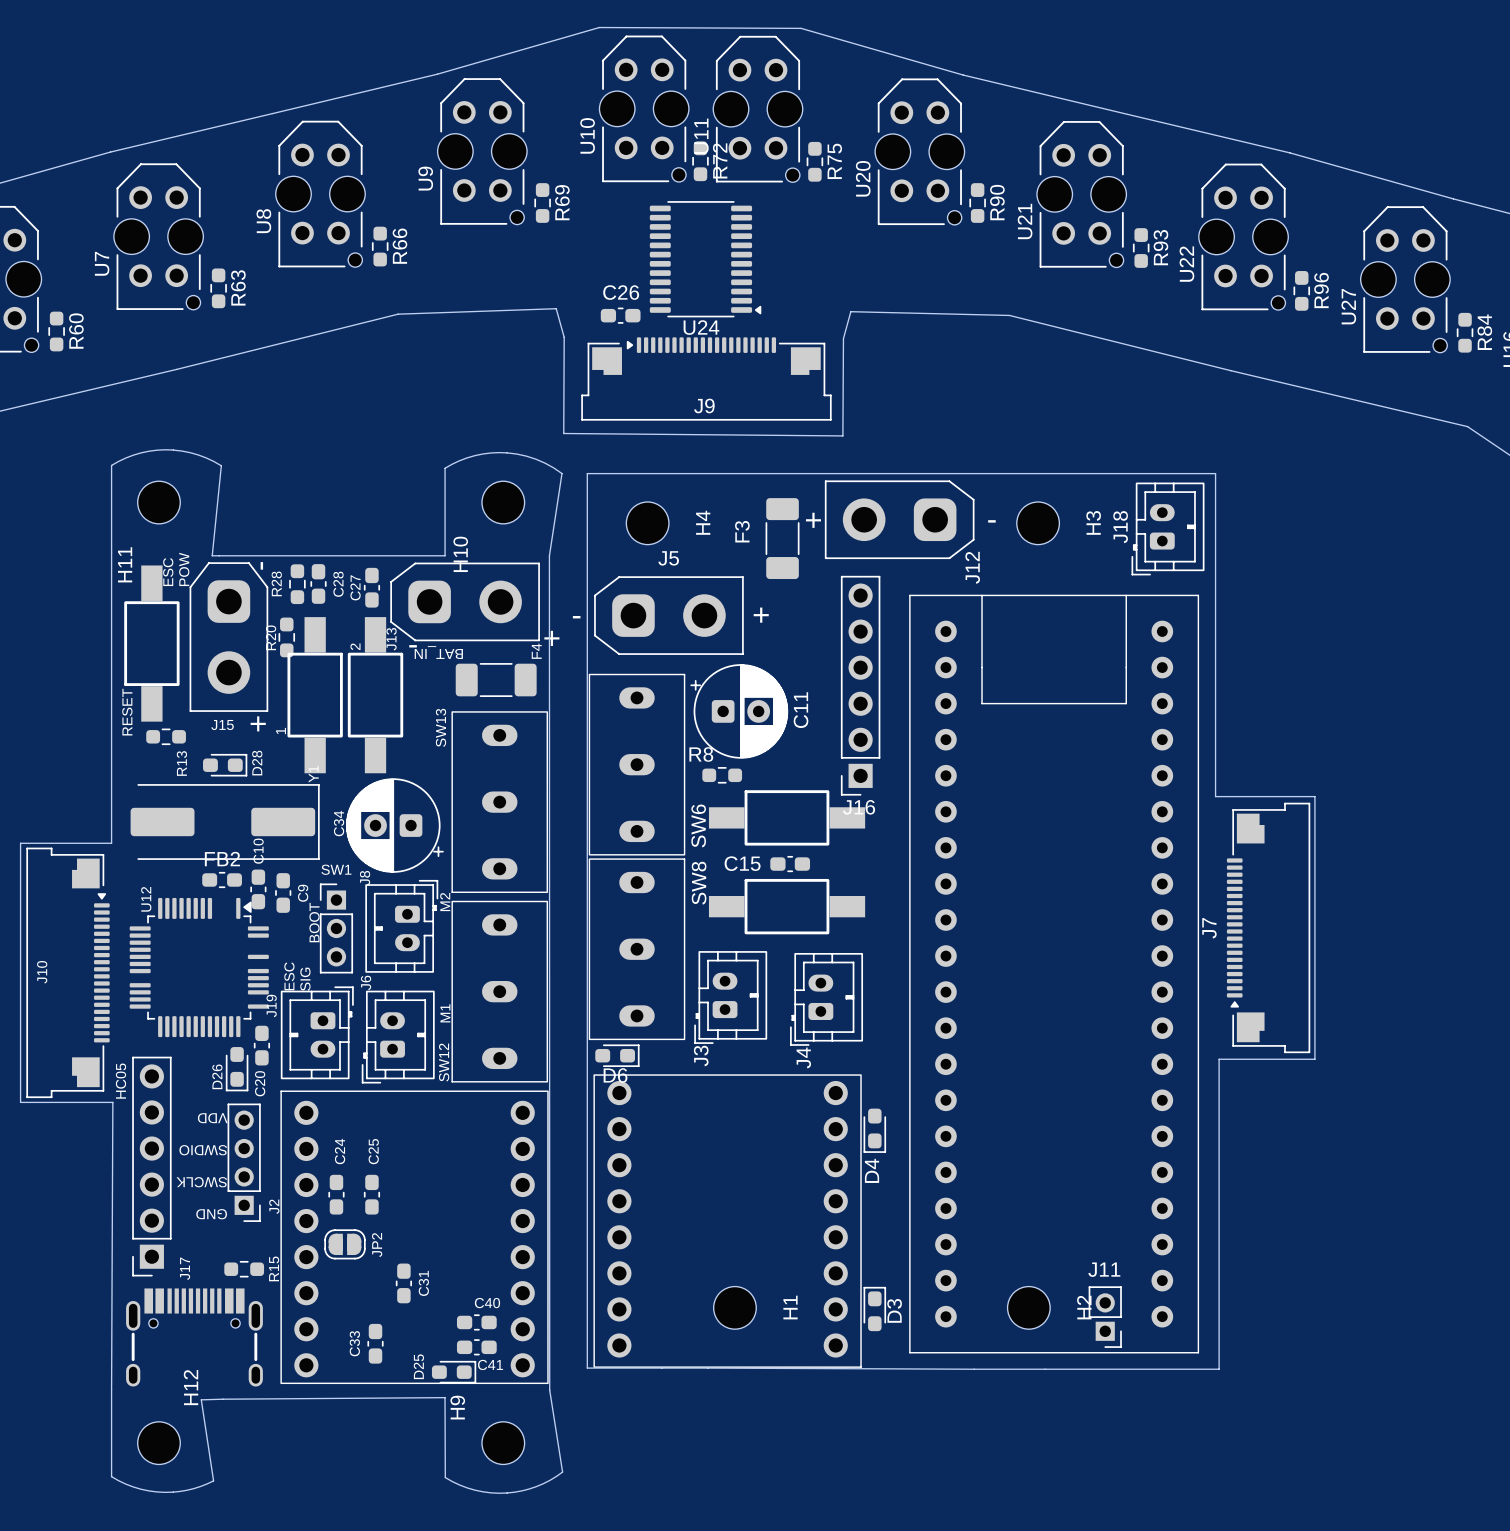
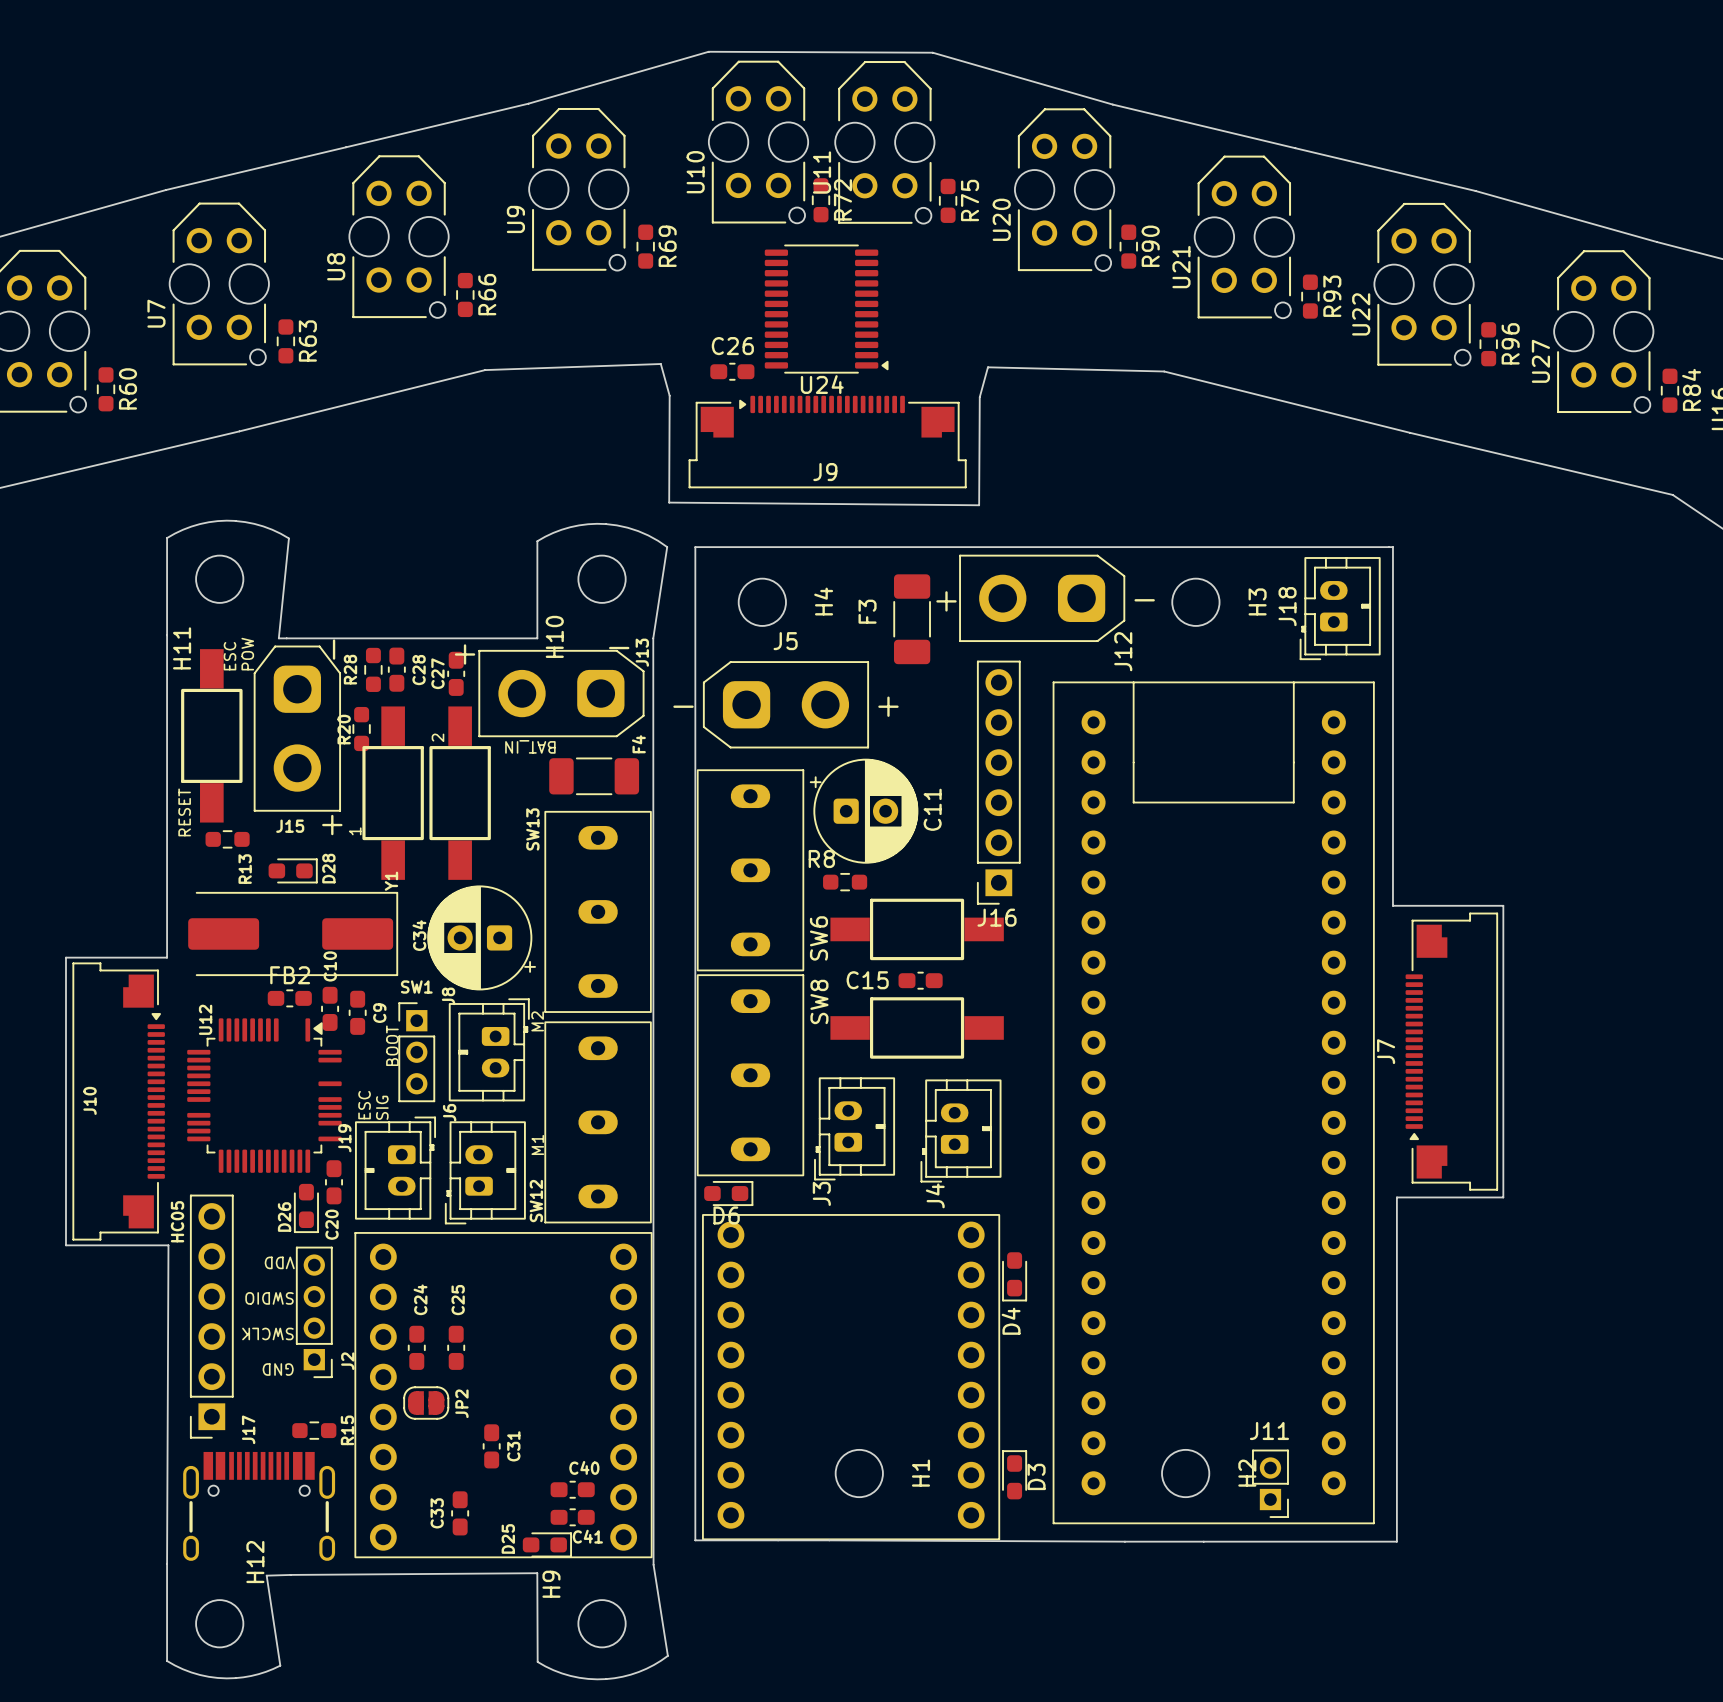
J13 rotation: 0° (465, 601) -> 180° (561, 693)

